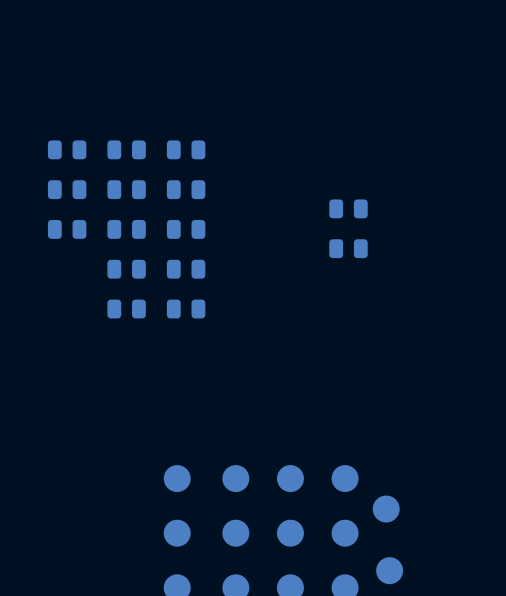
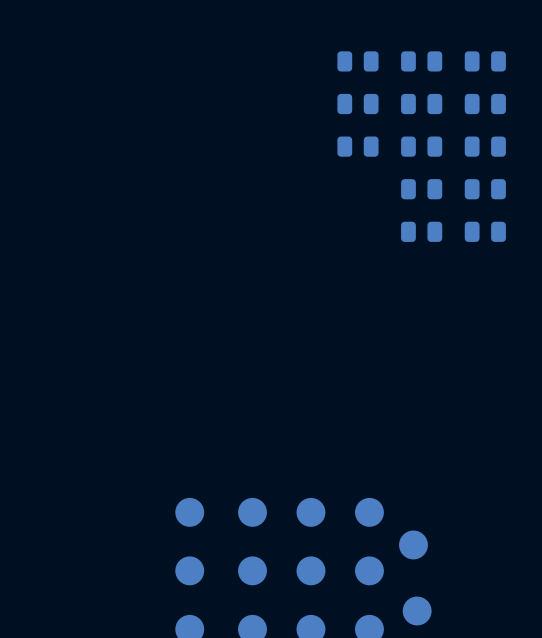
part: none -> (357, 61)
part: none -> (421, 61)
part: none -> (485, 61)
part: none -> (357, 104)
part: none -> (421, 104)
part: none -> (485, 104)
part: none -> (357, 146)
part: none -> (421, 146)
part: none -> (485, 146)
part: (67, 149) -> none
part: (126, 149) -> none
part: (186, 149) -> none
part: none -> (421, 189)
part: none -> (485, 189)
part: (67, 189) -> none
part: (126, 189) -> none
part: (186, 189) -> none
part: (348, 208) -> none
part: none -> (421, 231)
part: none -> (485, 231)
part: (67, 229) -> none
part: (126, 229) -> none
part: (186, 229) -> none
part: (348, 248) -> none
part: (126, 269) -> none
part: (186, 269) -> none
part: (126, 309) -> none
part: (186, 309) -> none

